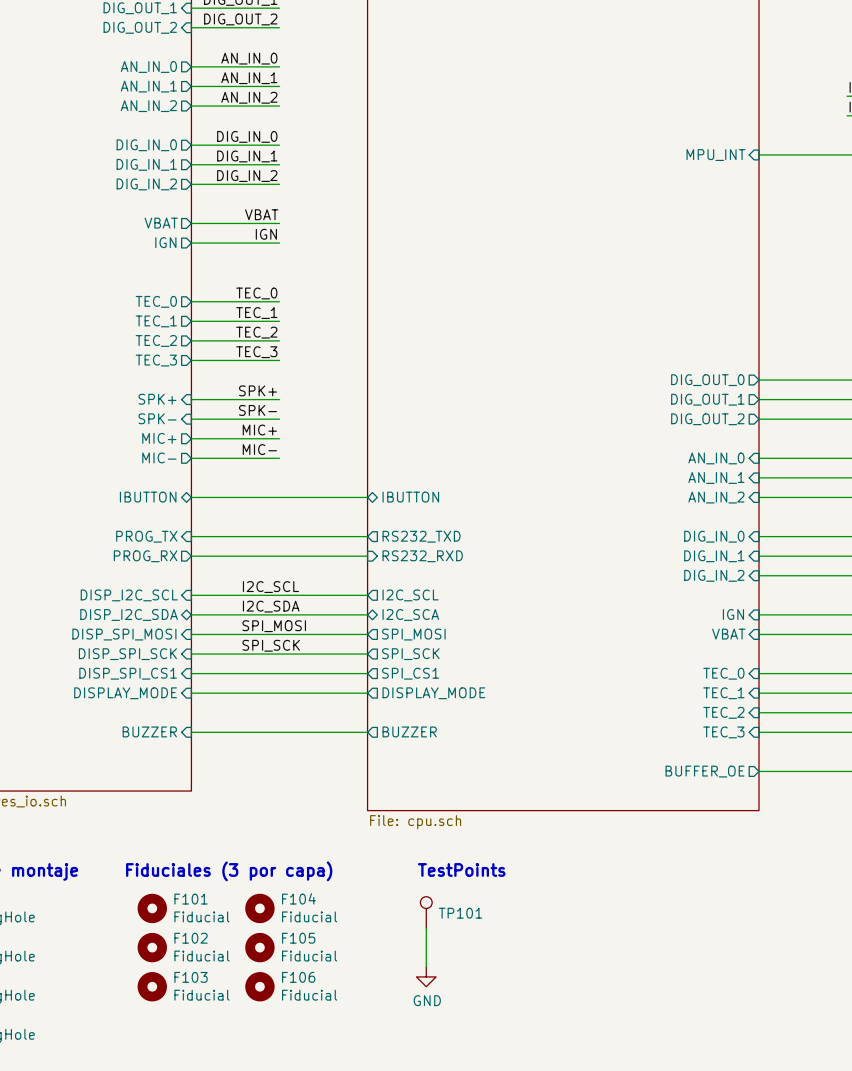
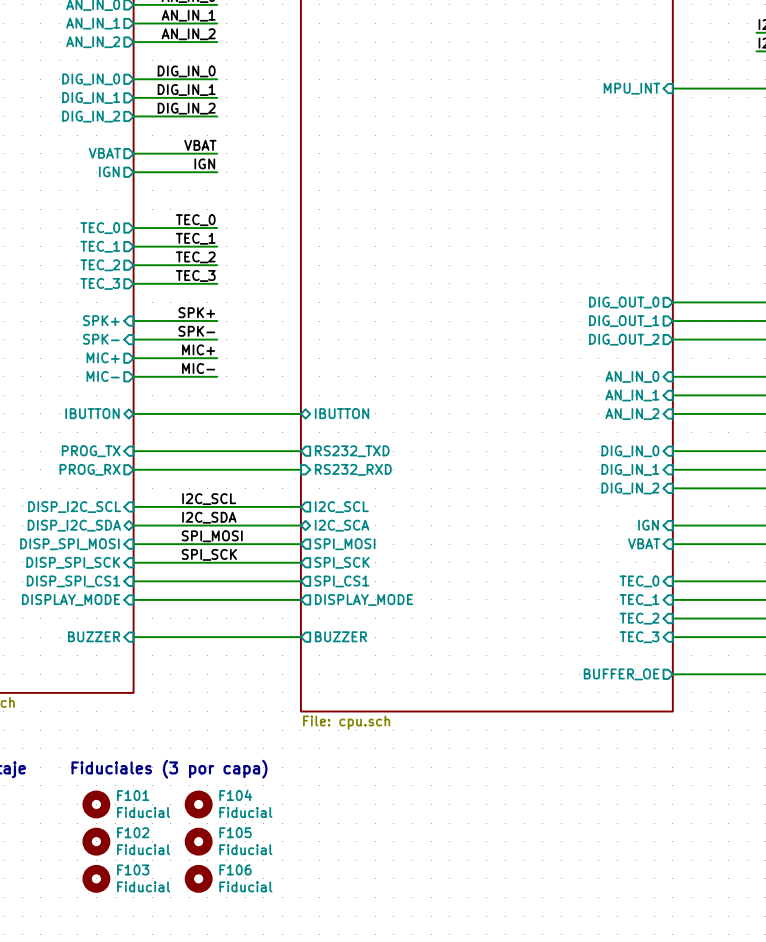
text: TestPoints (461, 869) -> none
TP101: (426, 912) -> none
wire: (426, 928) (426, 967) -> none
power symbol: GND (426, 976) -> none

